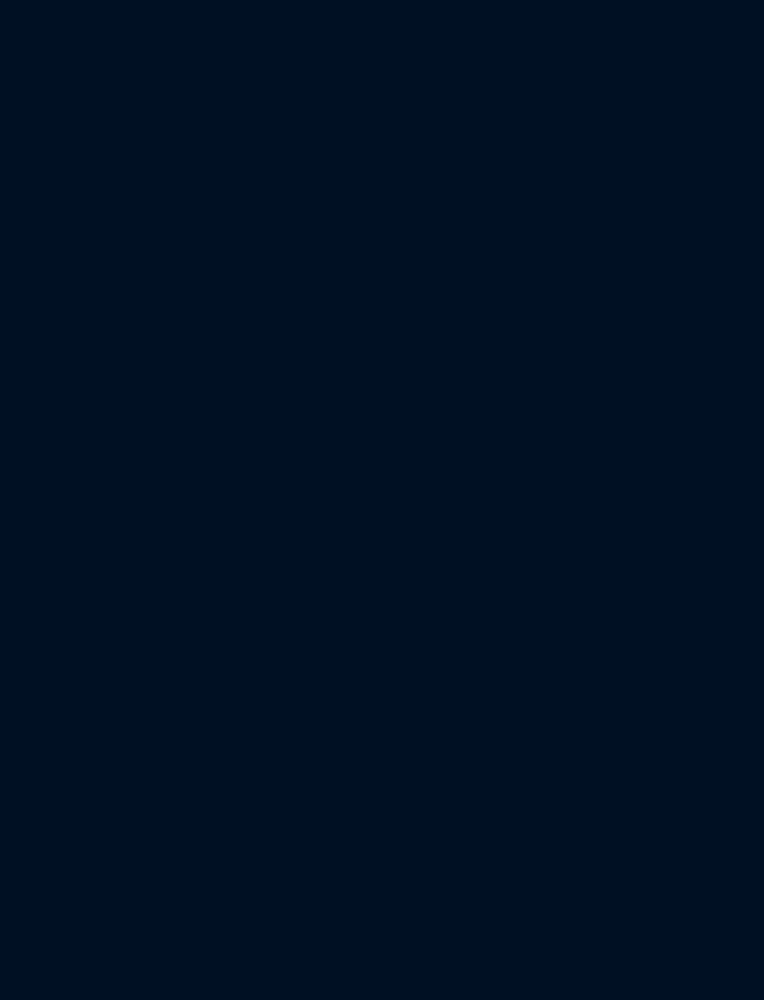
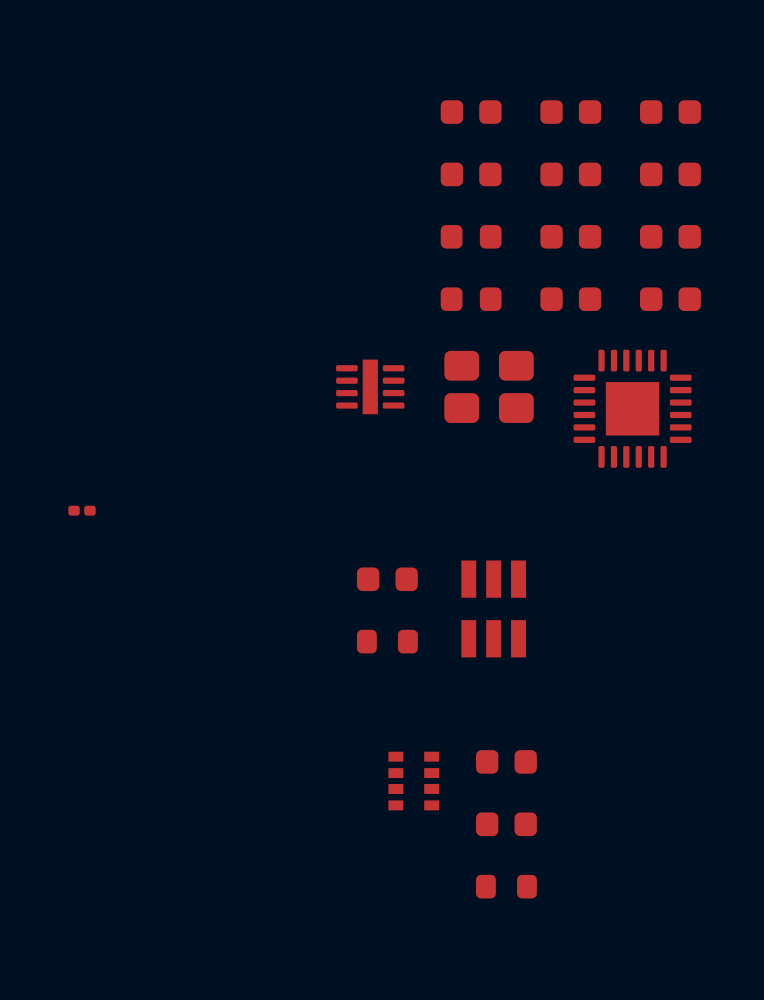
part: none -> (471, 112)
part: none -> (570, 112)
part: none -> (670, 112)
part: none -> (471, 174)
part: none -> (570, 174)
part: none -> (670, 174)
part: none -> (471, 236)
part: none -> (570, 236)
part: none -> (670, 236)
part: none -> (471, 299)
part: none -> (570, 299)
part: none -> (670, 299)
part: none -> (370, 386)
part: none -> (489, 386)
part: none -> (632, 408)
part: none -> (81, 510)
part: none -> (387, 579)
part: none -> (493, 608)
part: none -> (387, 641)
part: none -> (506, 761)
part: none -> (413, 781)
part: none -> (506, 824)
part: none -> (506, 886)

